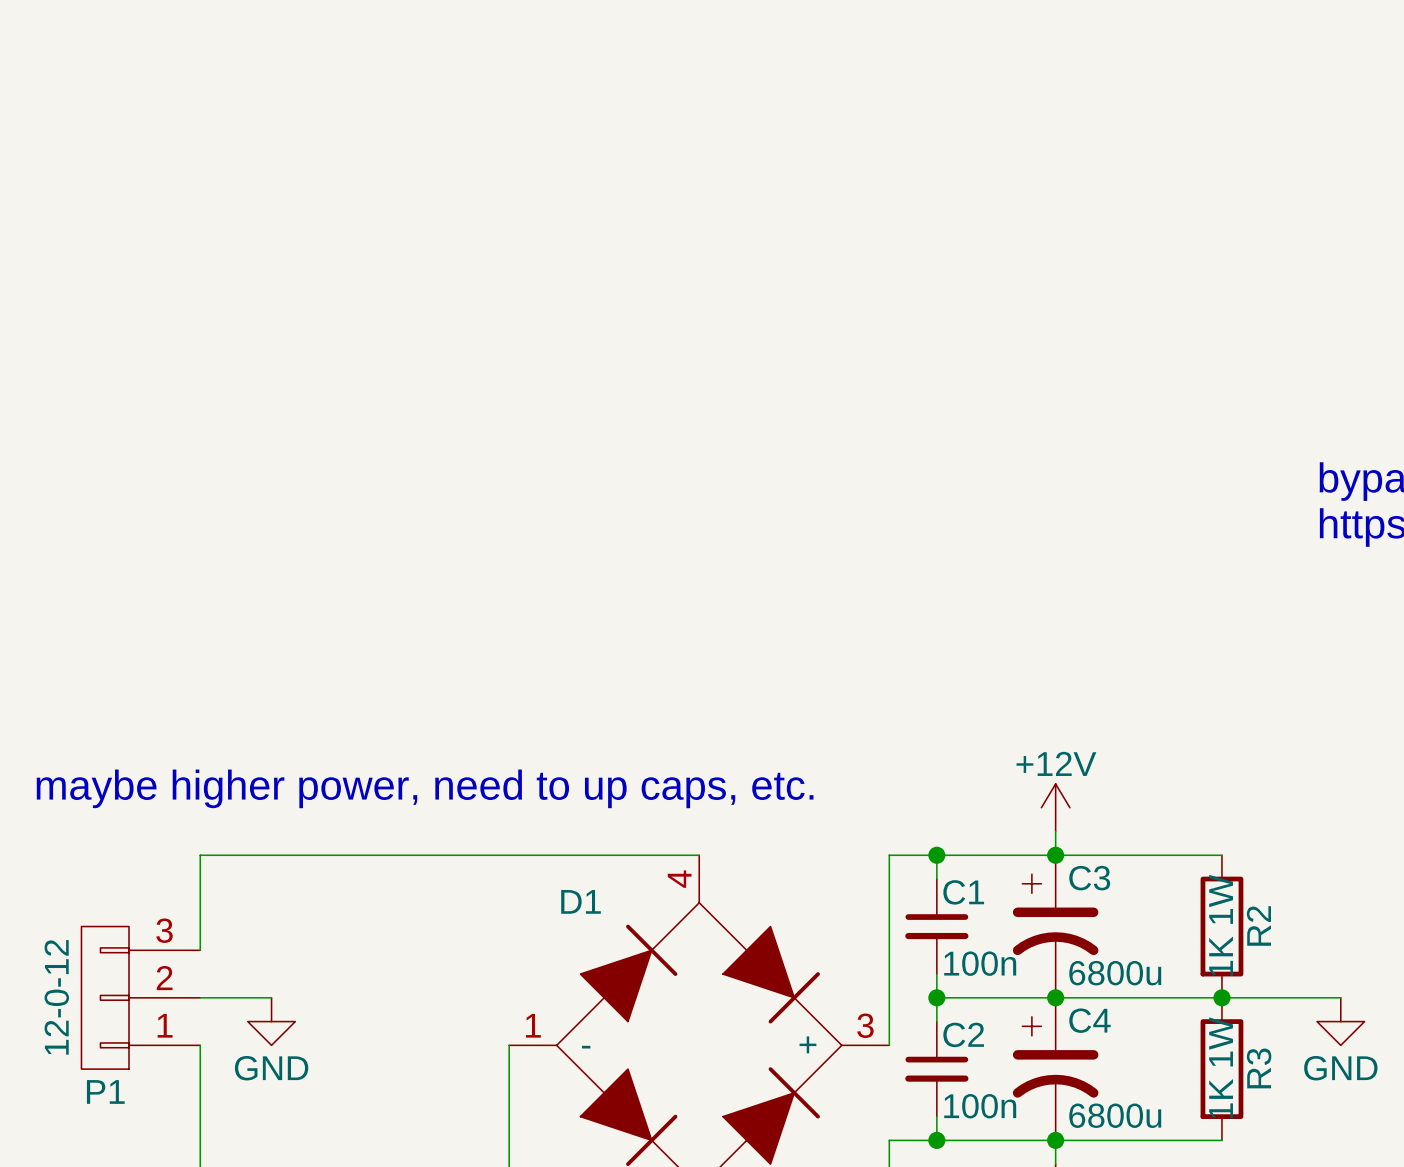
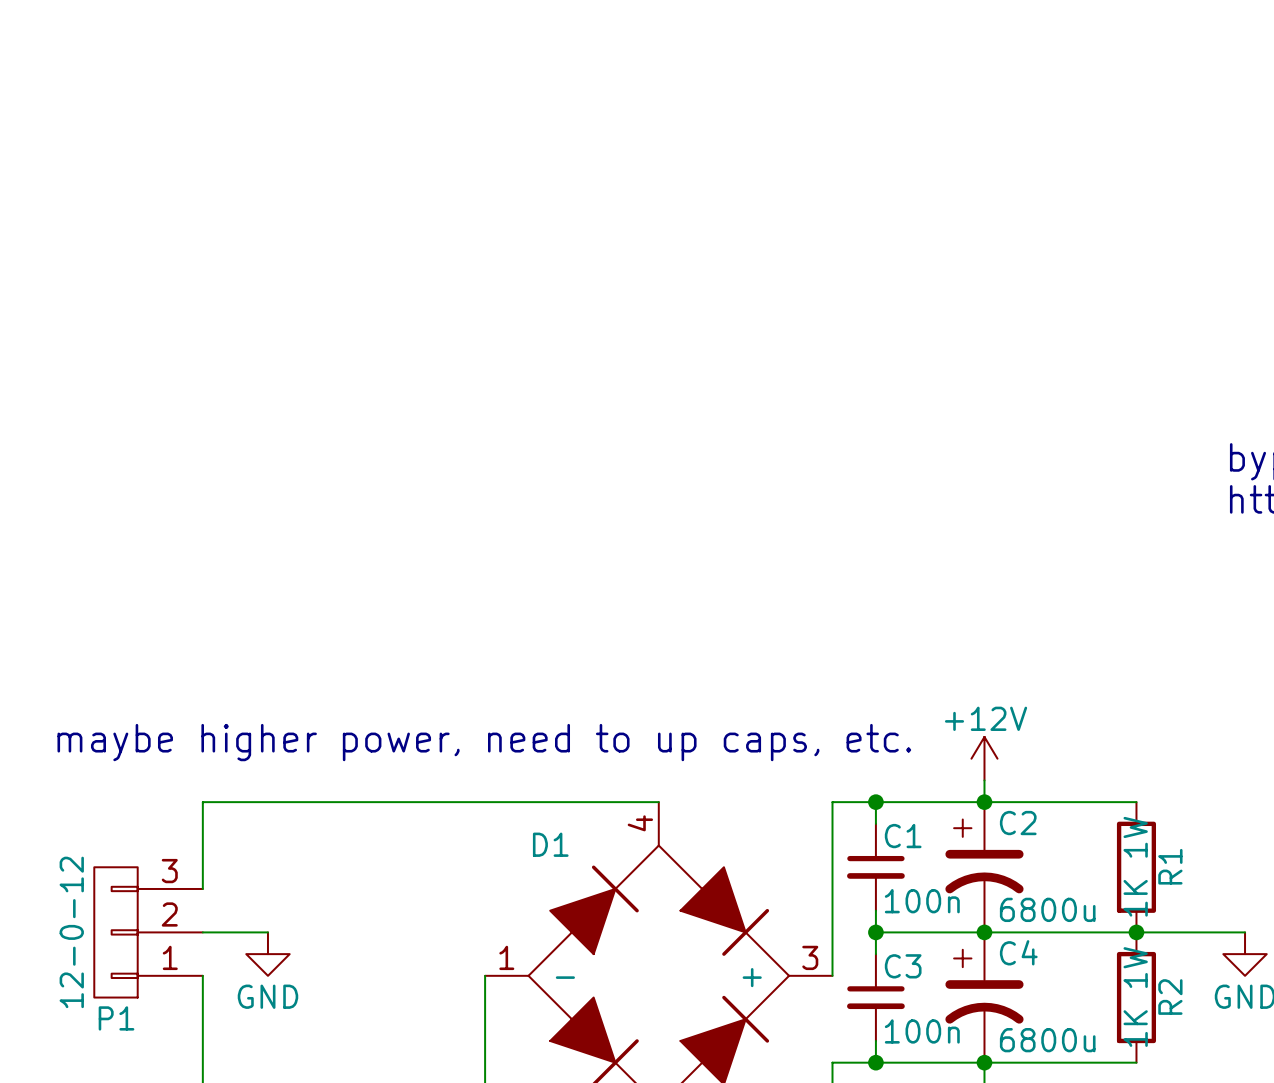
C3 name: C3 (1089, 878) -> C2 (1018, 823)
R2 name: R2 (1258, 925) -> R1 (1170, 866)
C2 name: C2 (963, 1034) -> C3 (903, 966)
R3 name: R3 (1259, 1068) -> R2 (1170, 997)

